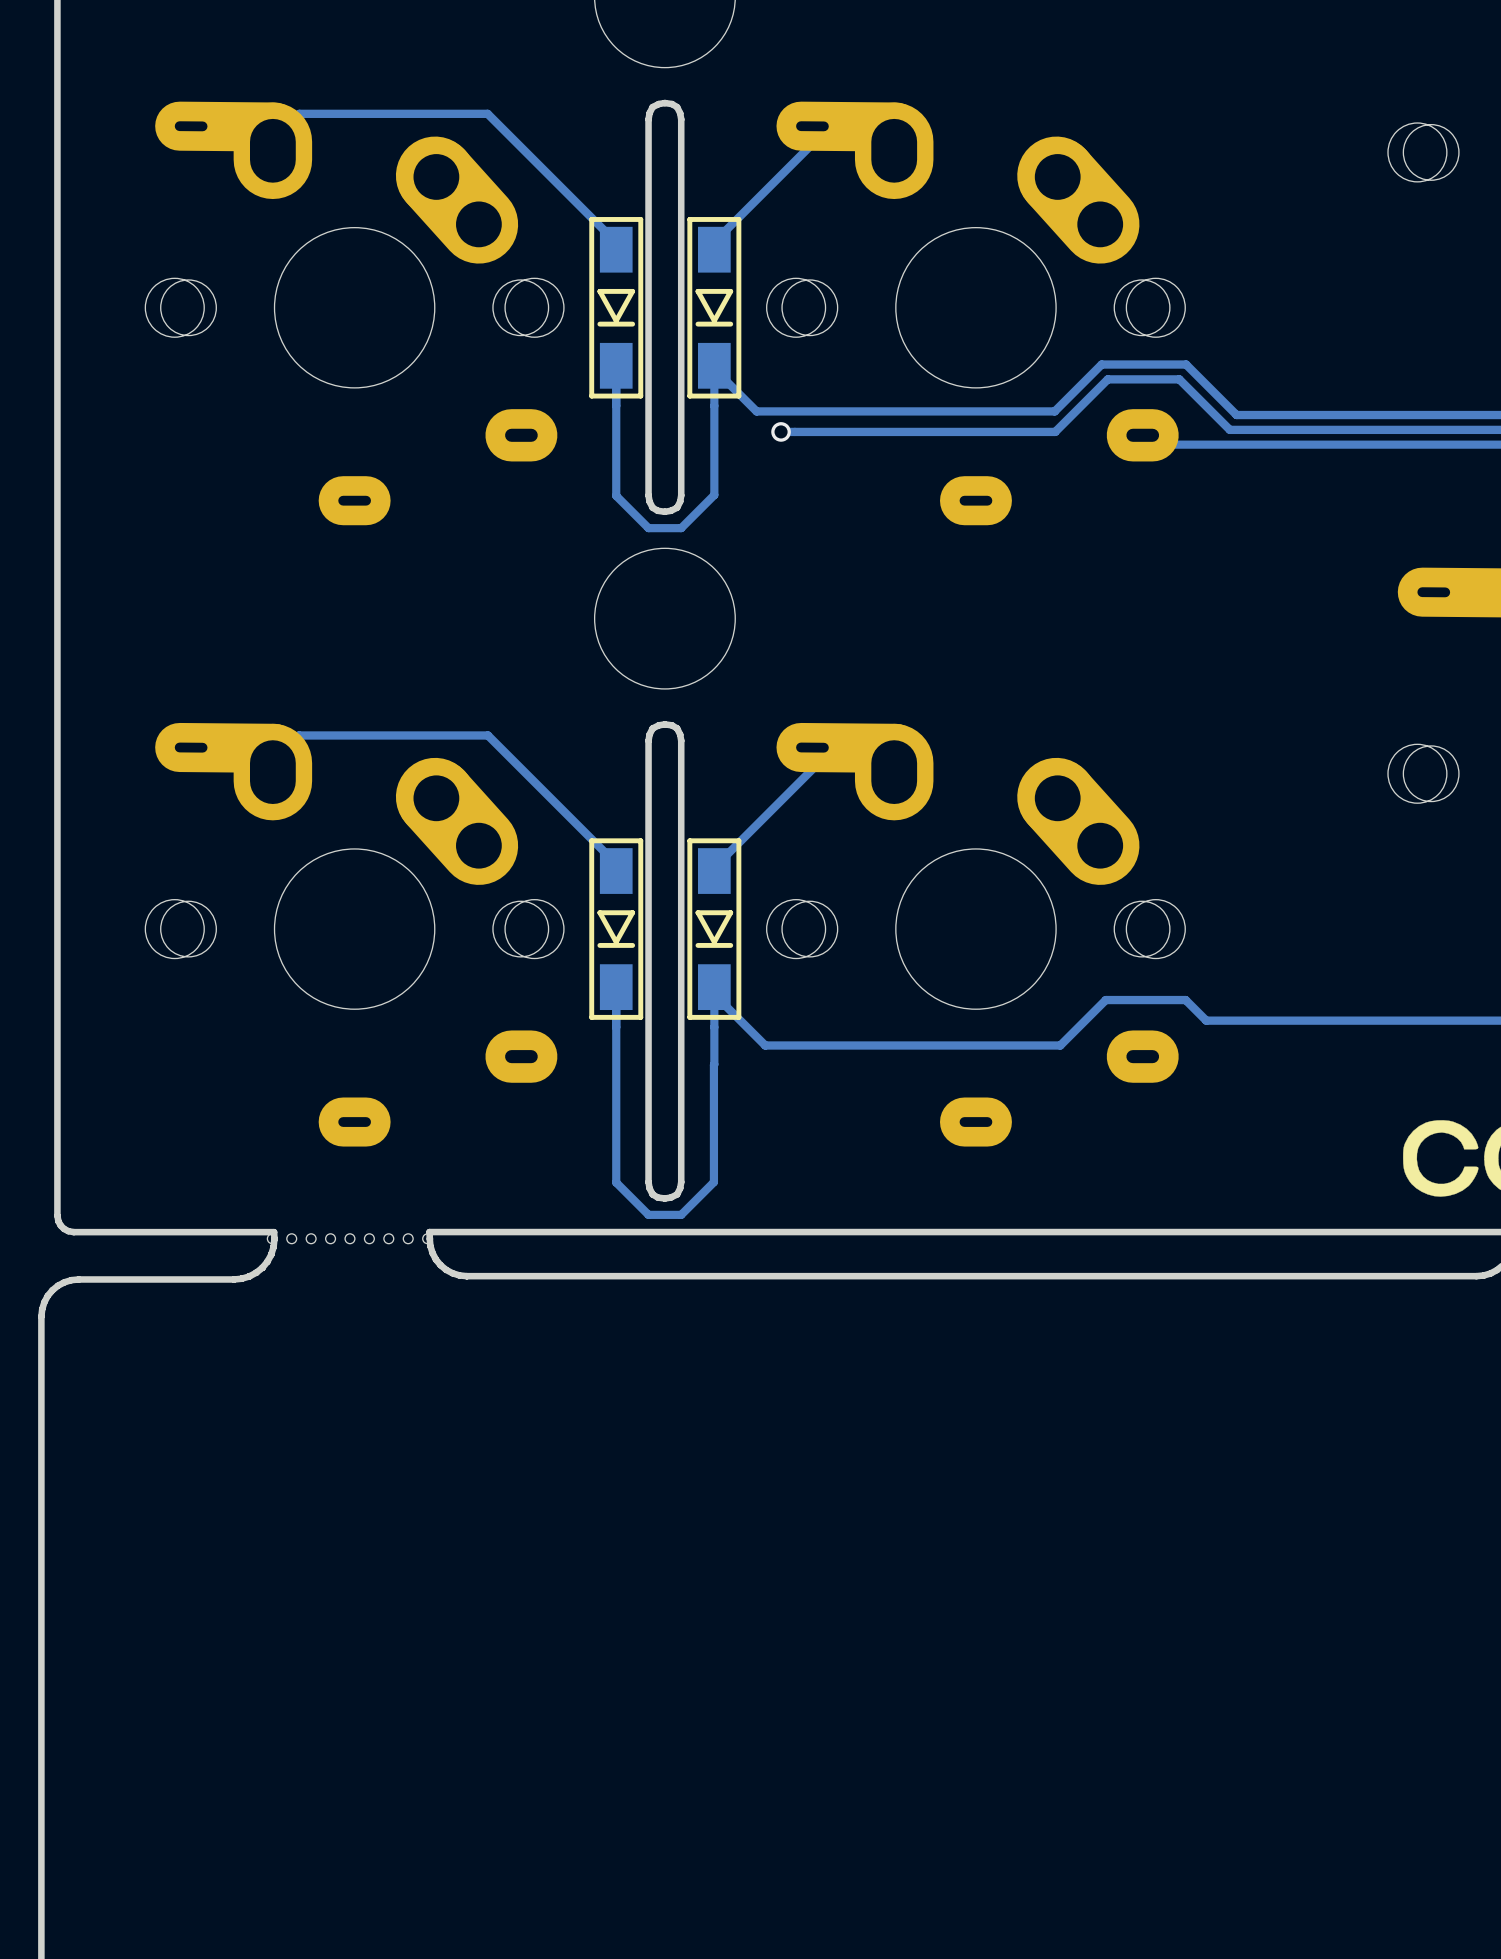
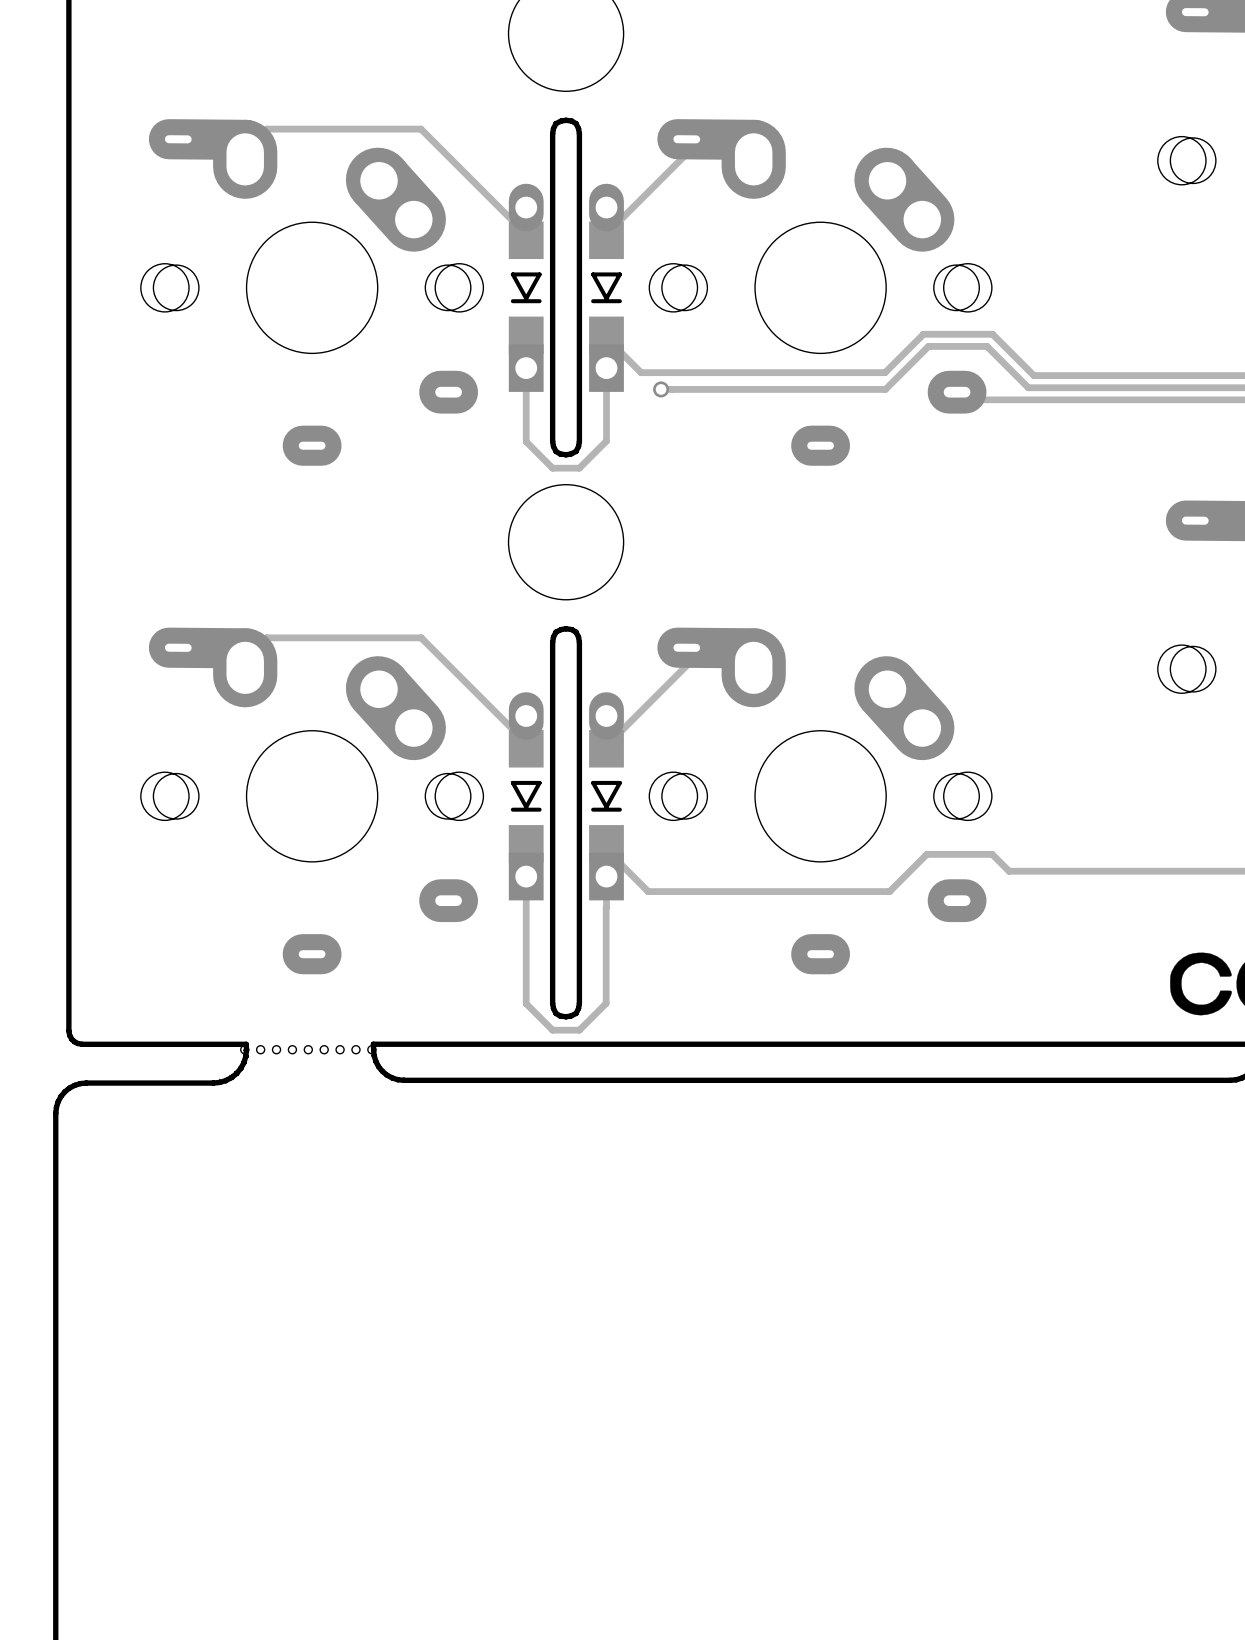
part footprint: [589, 217, 644, 399] -> [508, 183, 544, 392]
part footprint: [687, 217, 742, 399] -> [589, 183, 624, 392]
part footprint: [589, 838, 644, 1020] -> [508, 692, 544, 901]
part footprint: [687, 838, 742, 1020] -> [589, 692, 624, 901]

